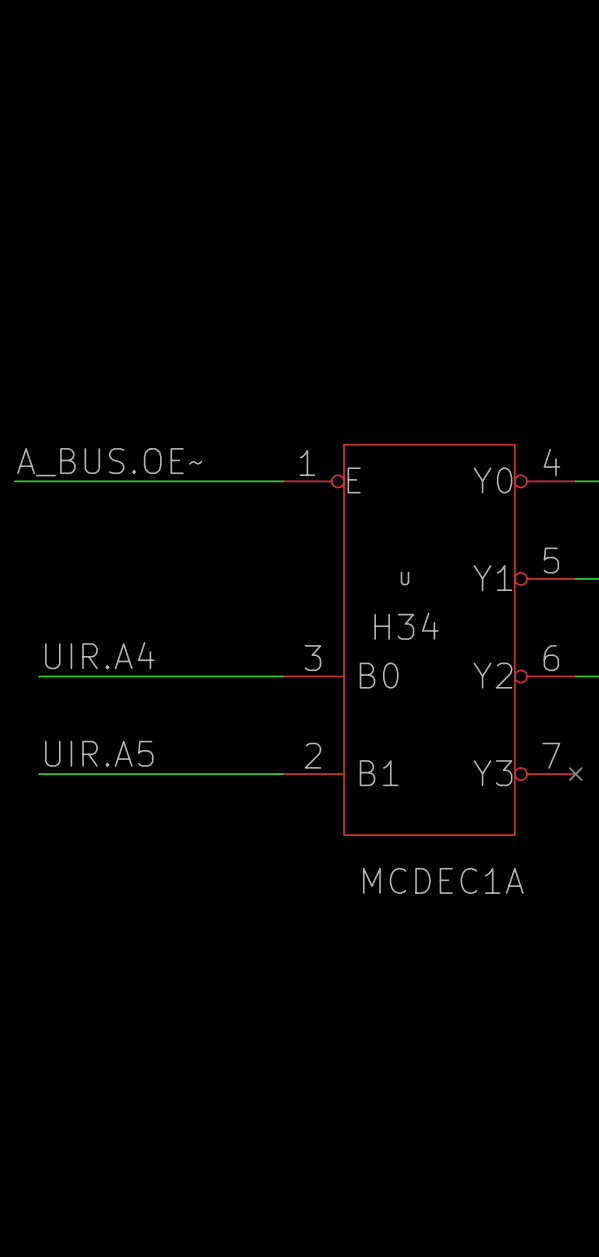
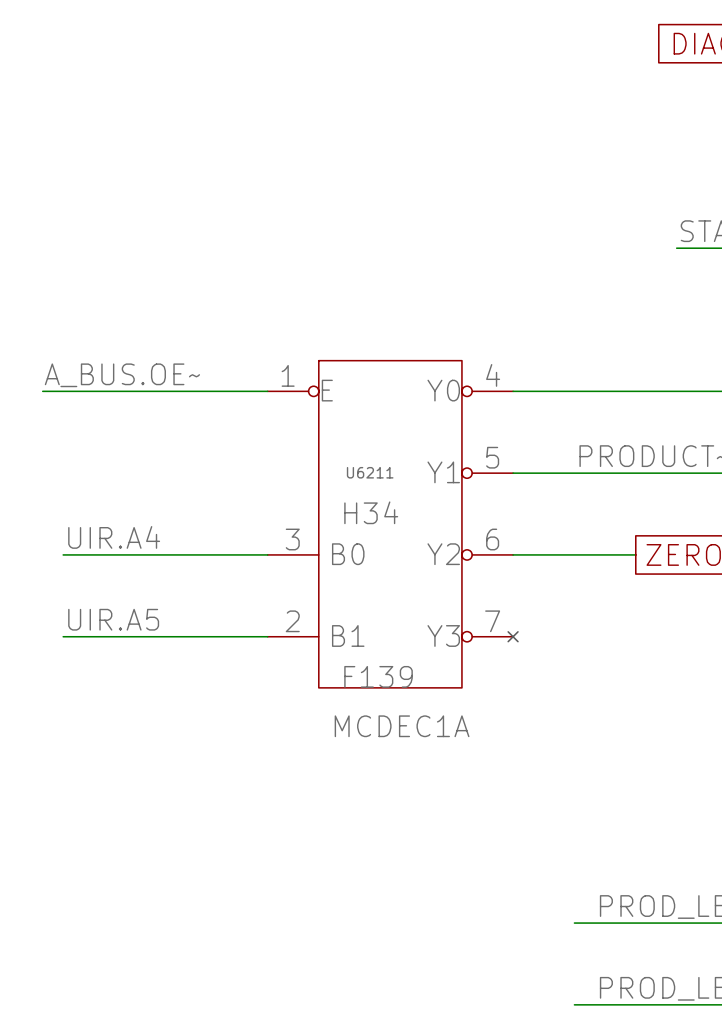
U name: U (405, 578) -> U6211 (370, 472)
U value: none -> F139 (378, 676)

